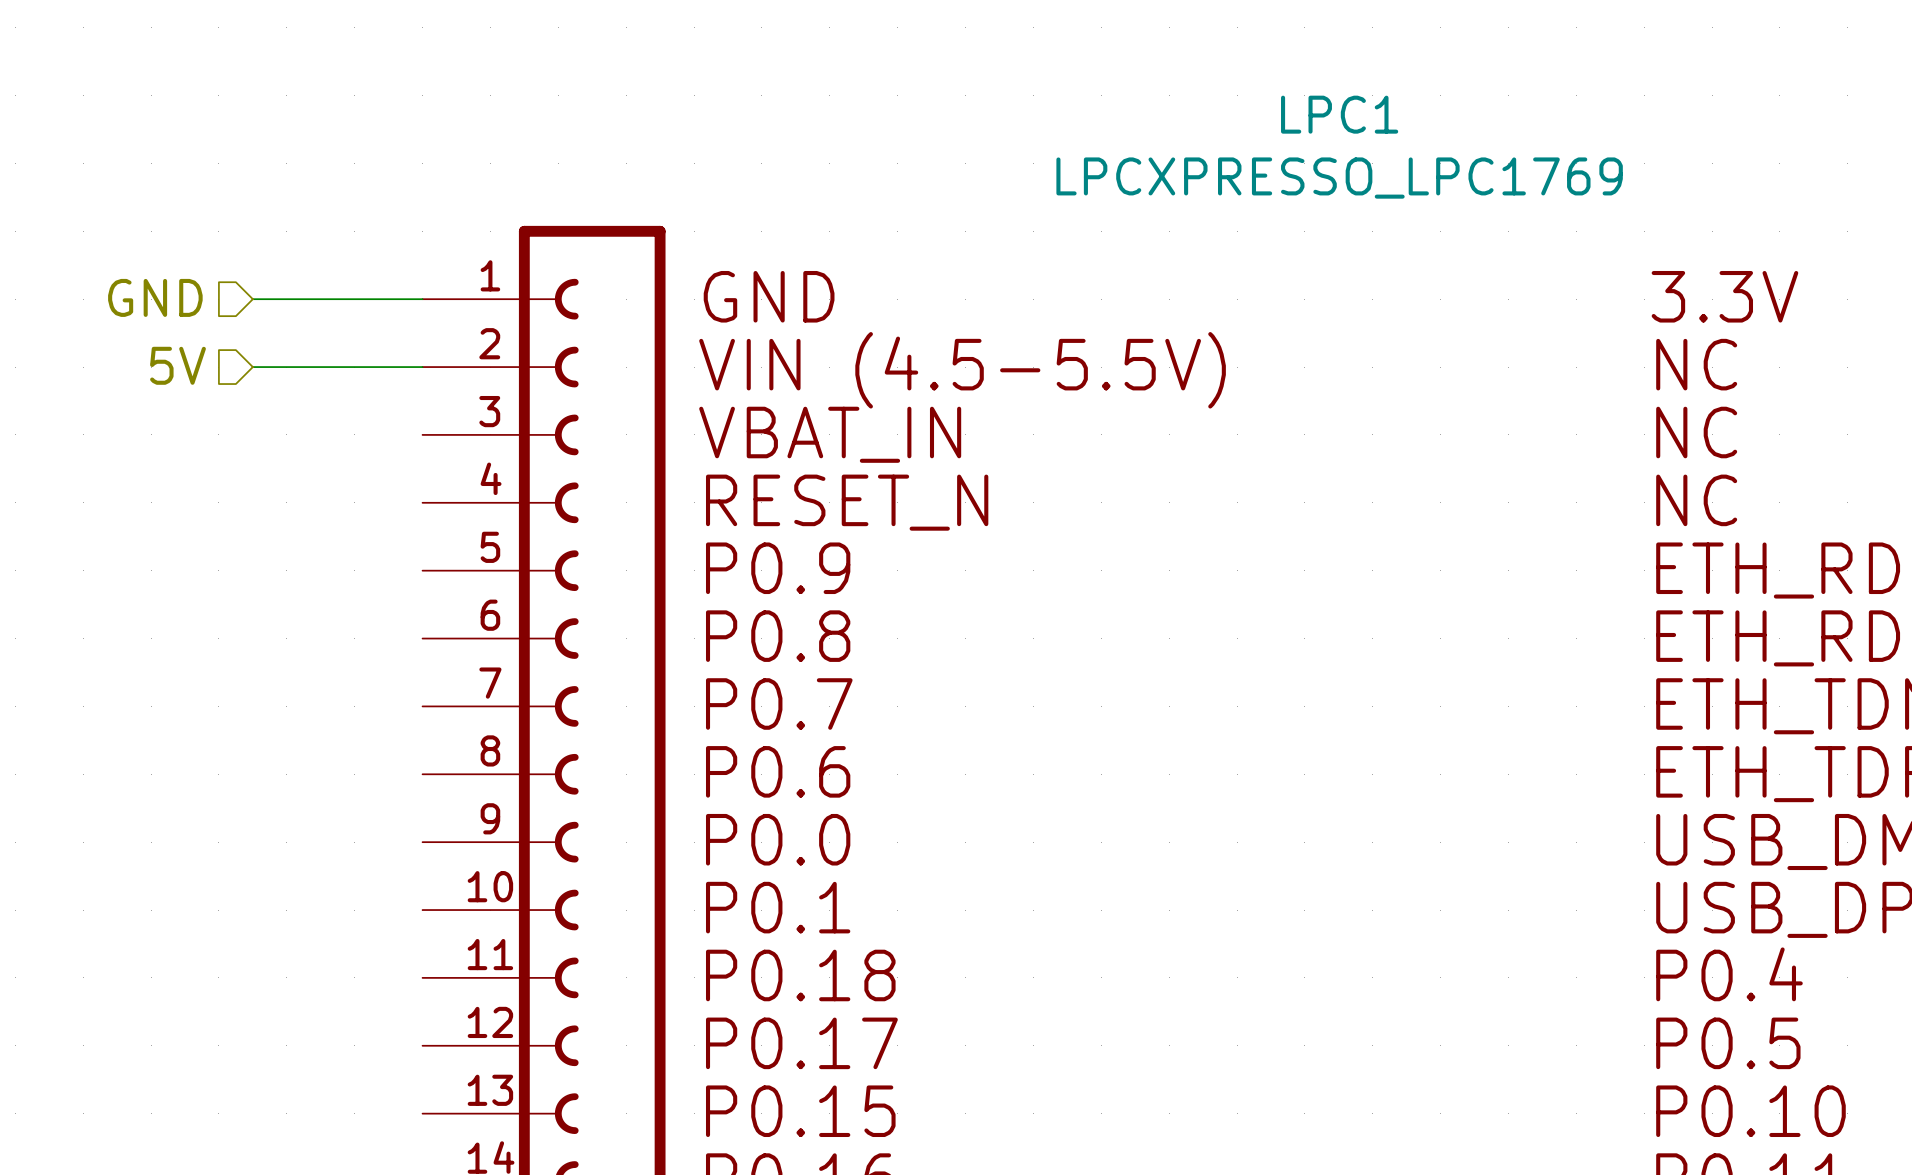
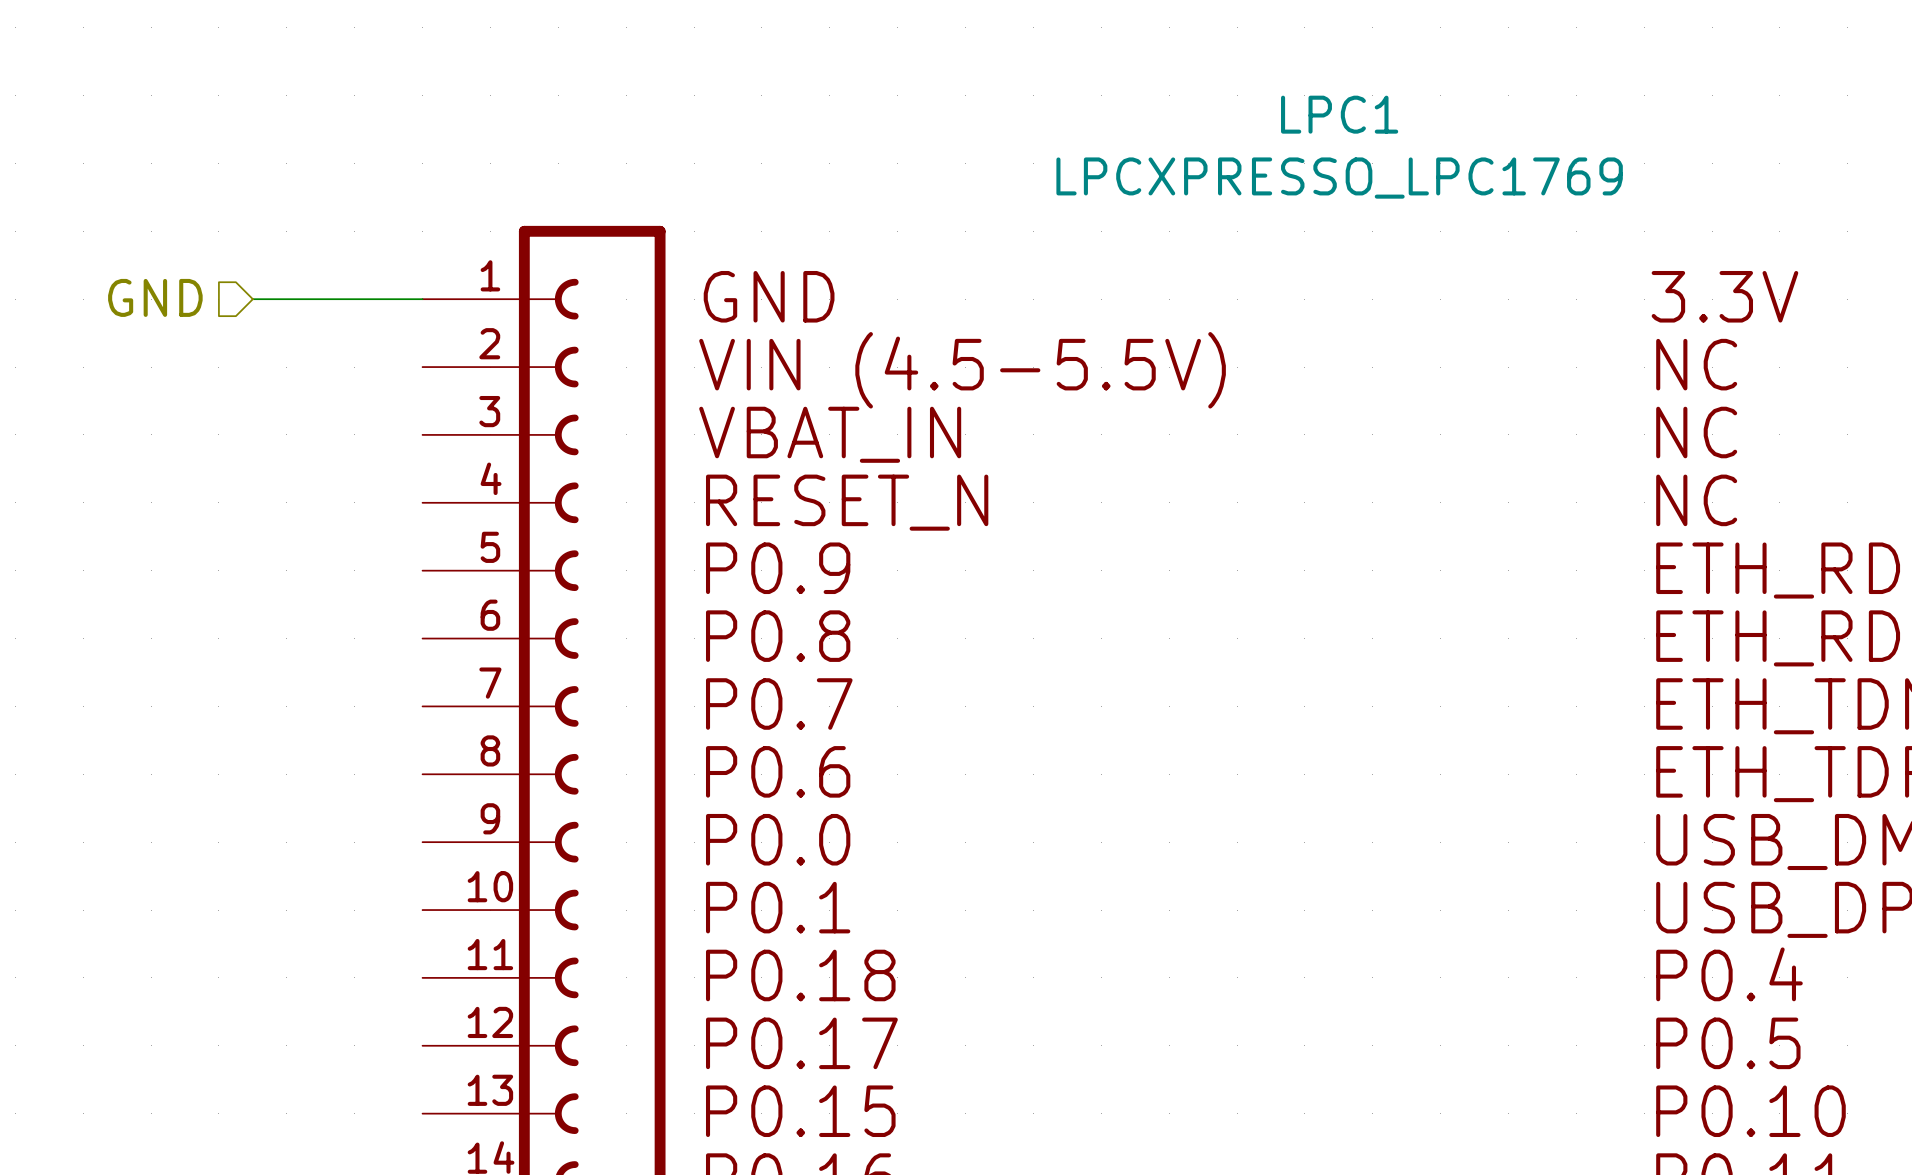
hierarchical label: 5V (178, 365) -> none
wire: (252, 367) (422, 367) -> none

